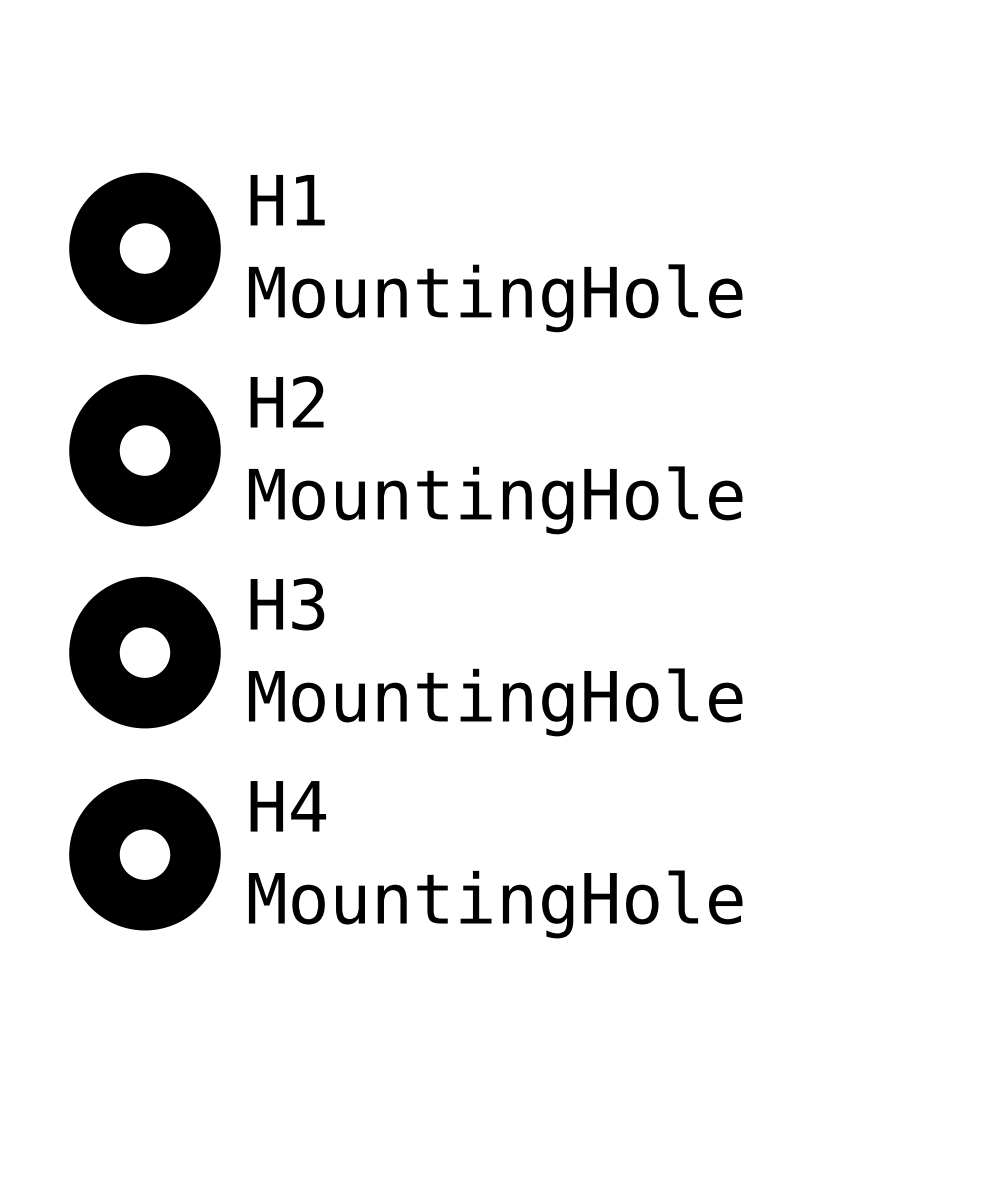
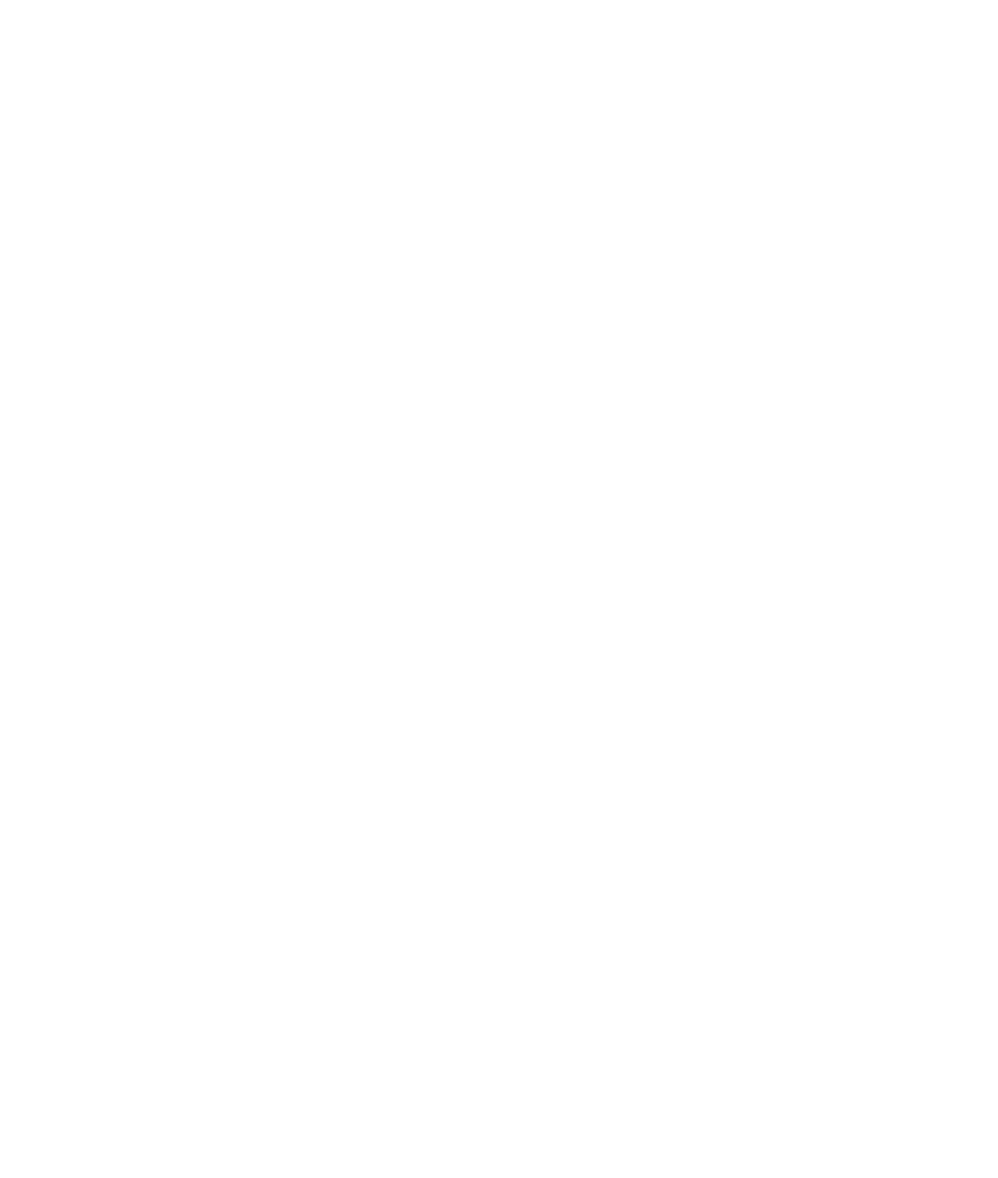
H1: MountingHole (144, 248) -> none
H2: MountingHole (144, 450) -> none
H3: MountingHole (144, 652) -> none
H4: MountingHole (144, 854) -> none

